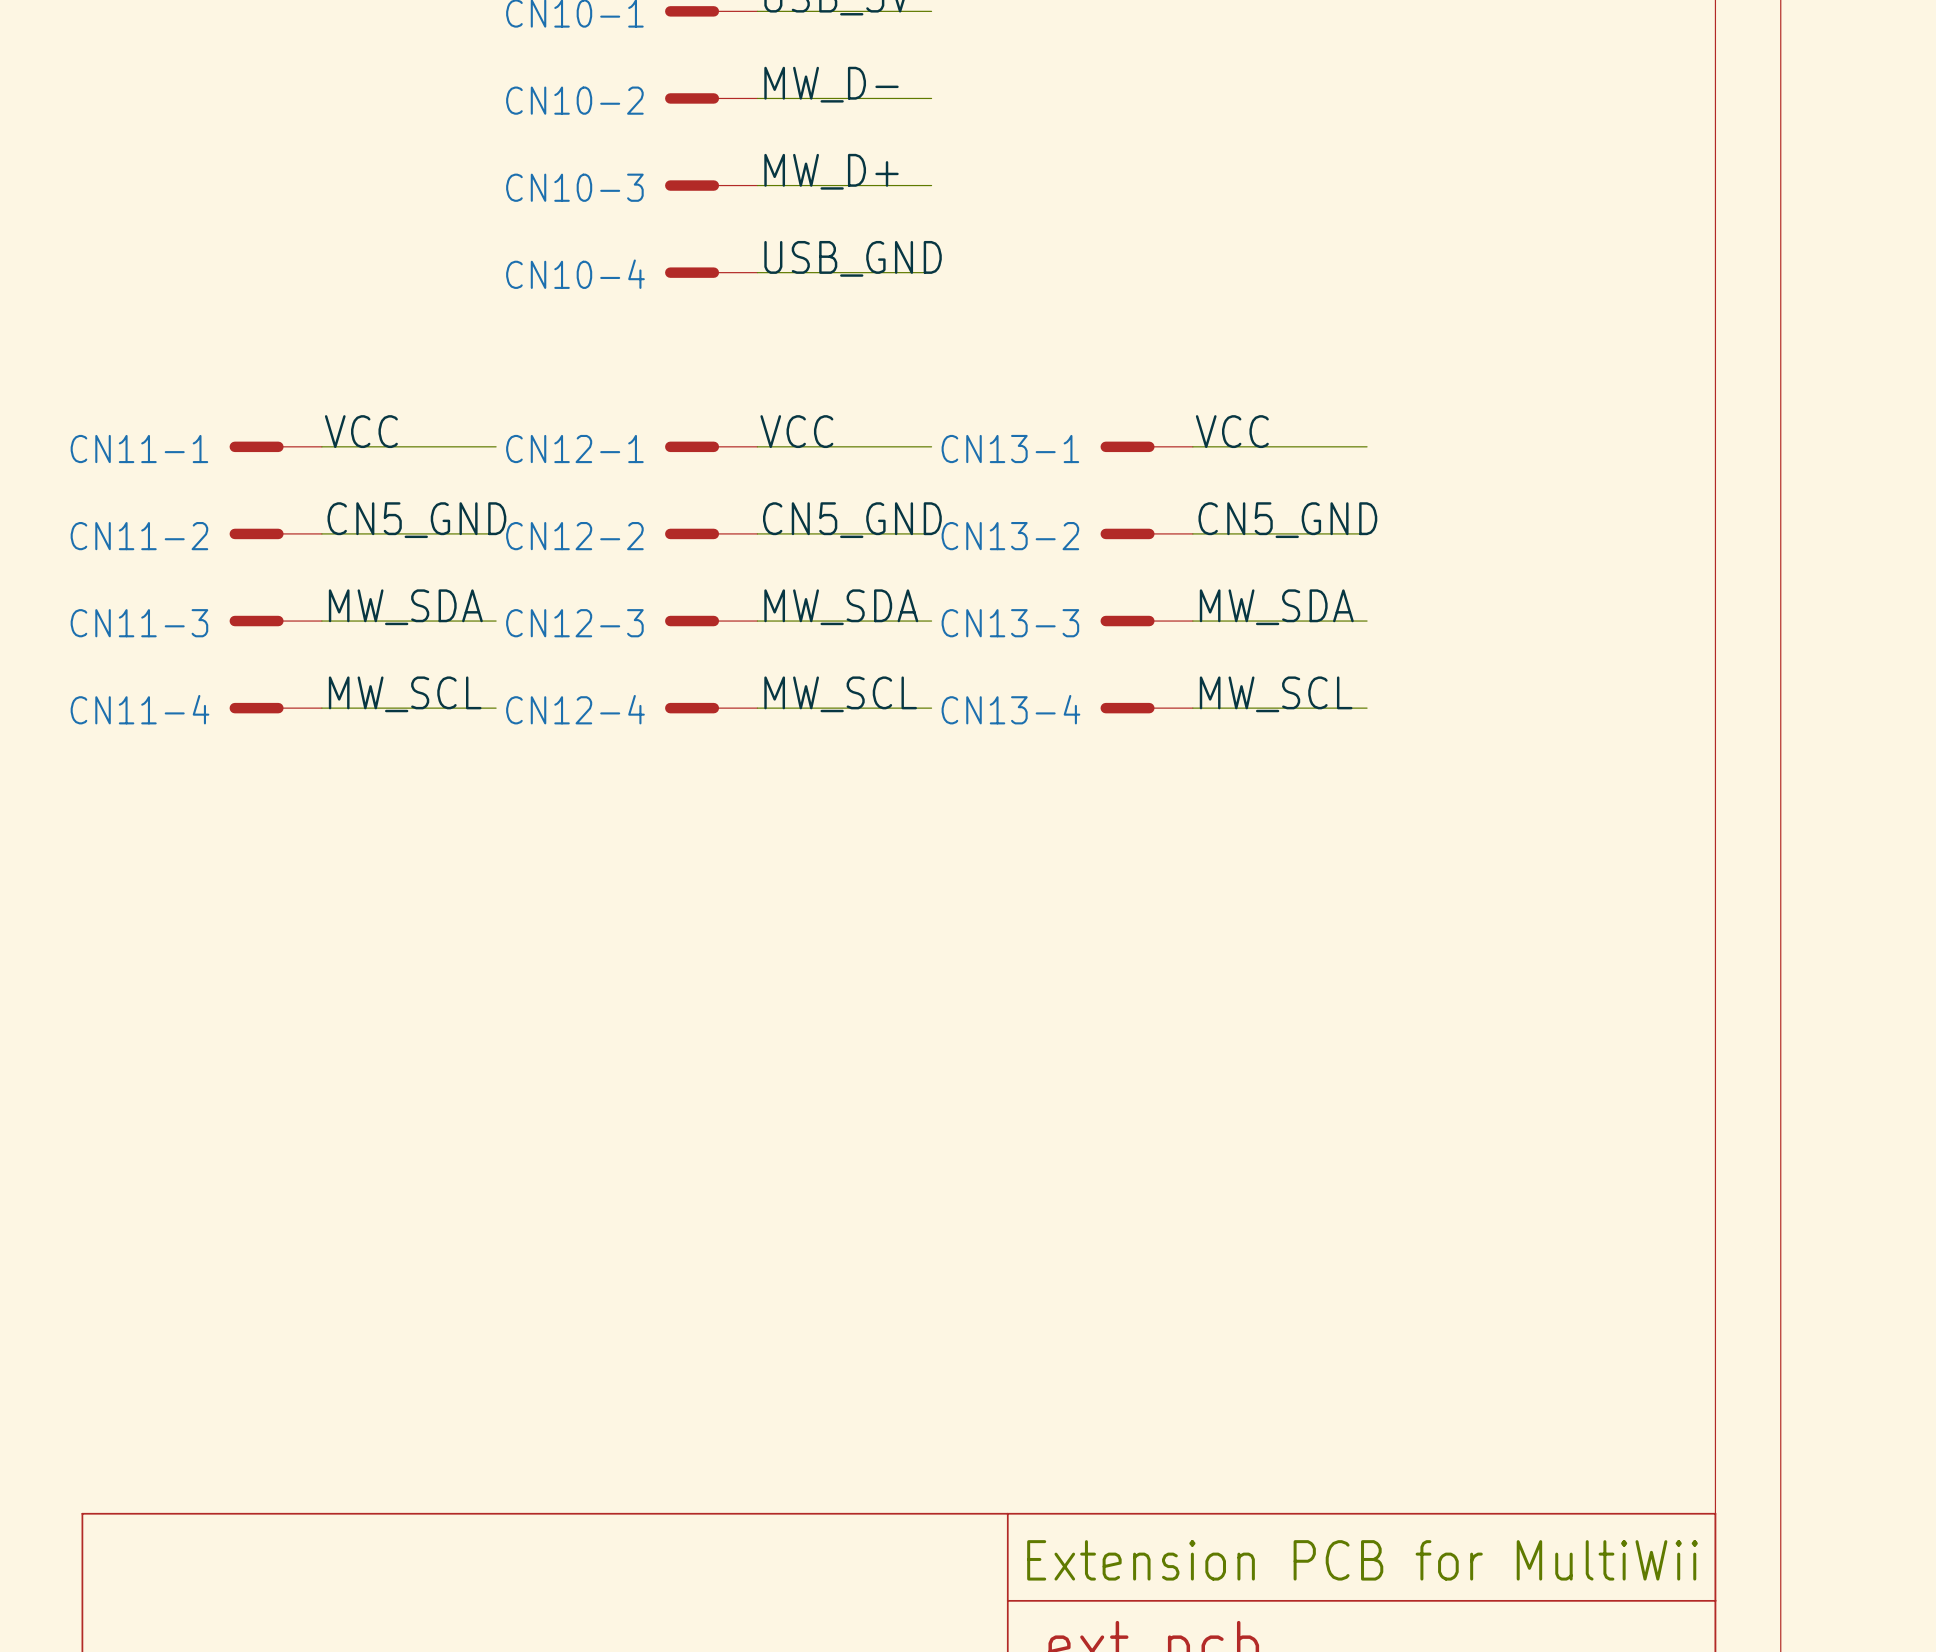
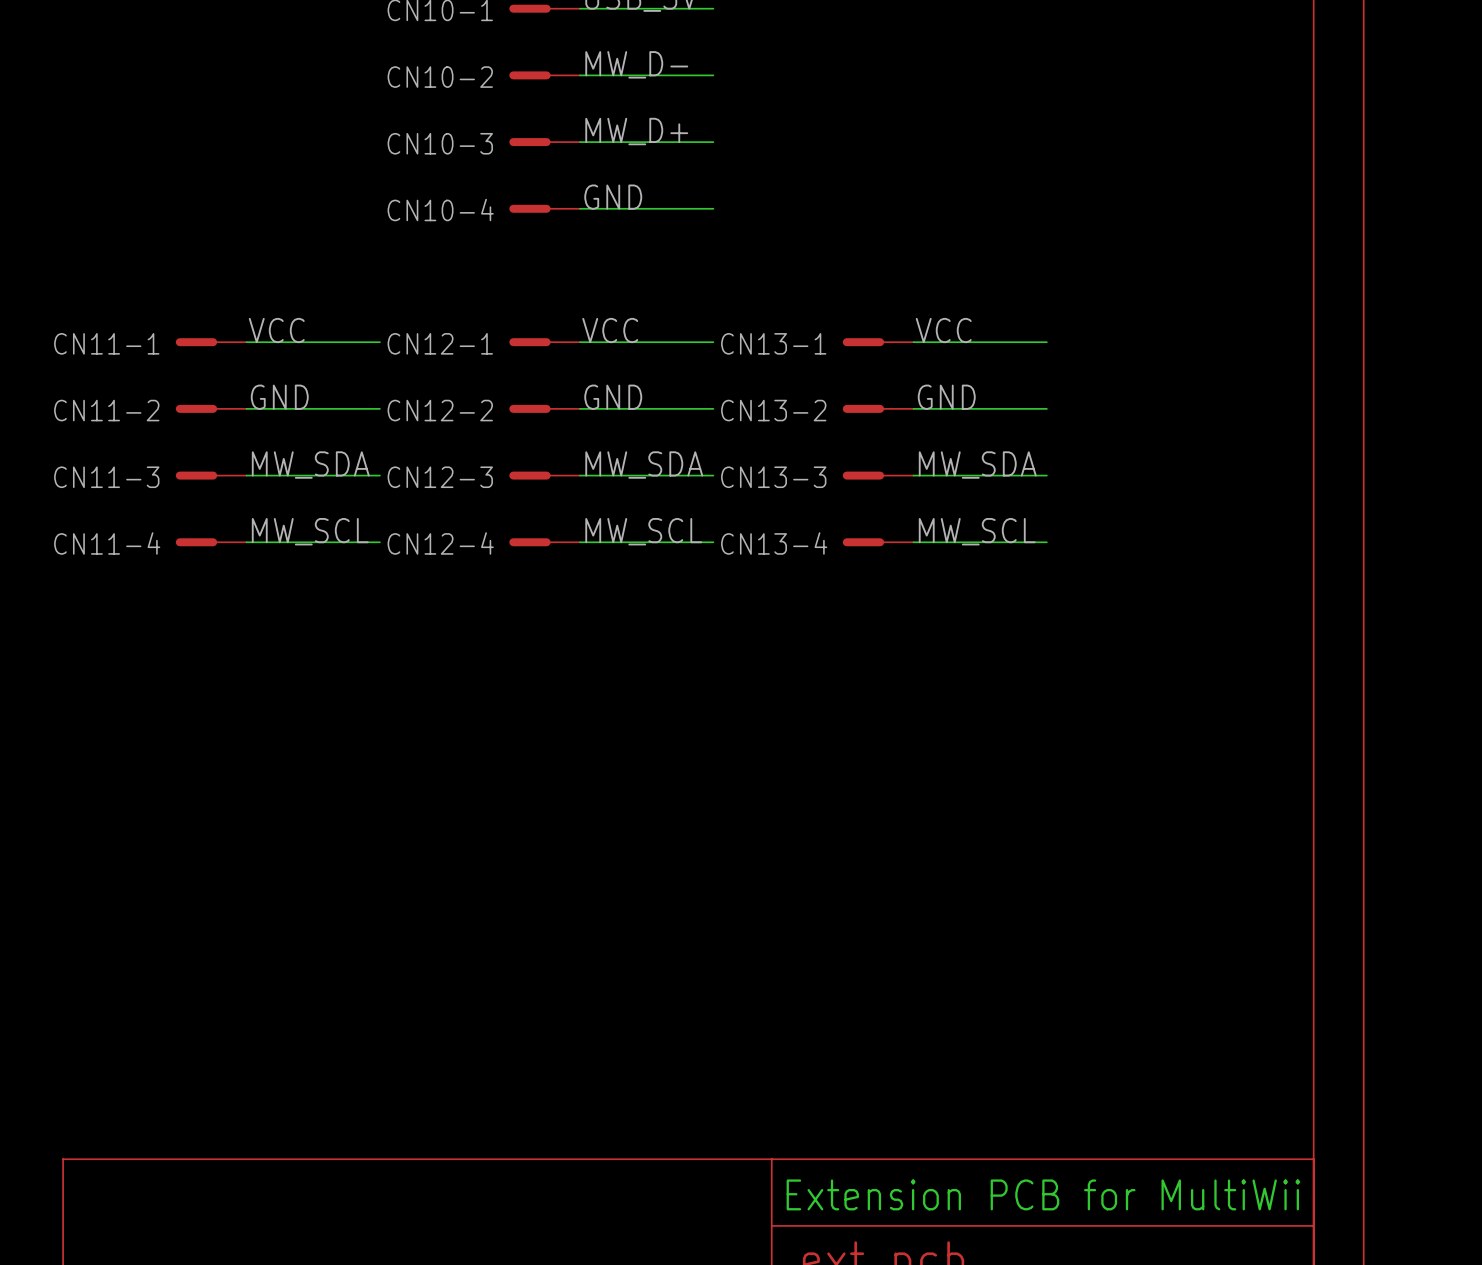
label: USB_GND (853, 258) -> GND (613, 197)
label: CN5_GND (416, 520) -> GND (279, 397)
label: CN5_GND (852, 520) -> GND (613, 397)
label: CN5_GND (1287, 520) -> GND (946, 397)

